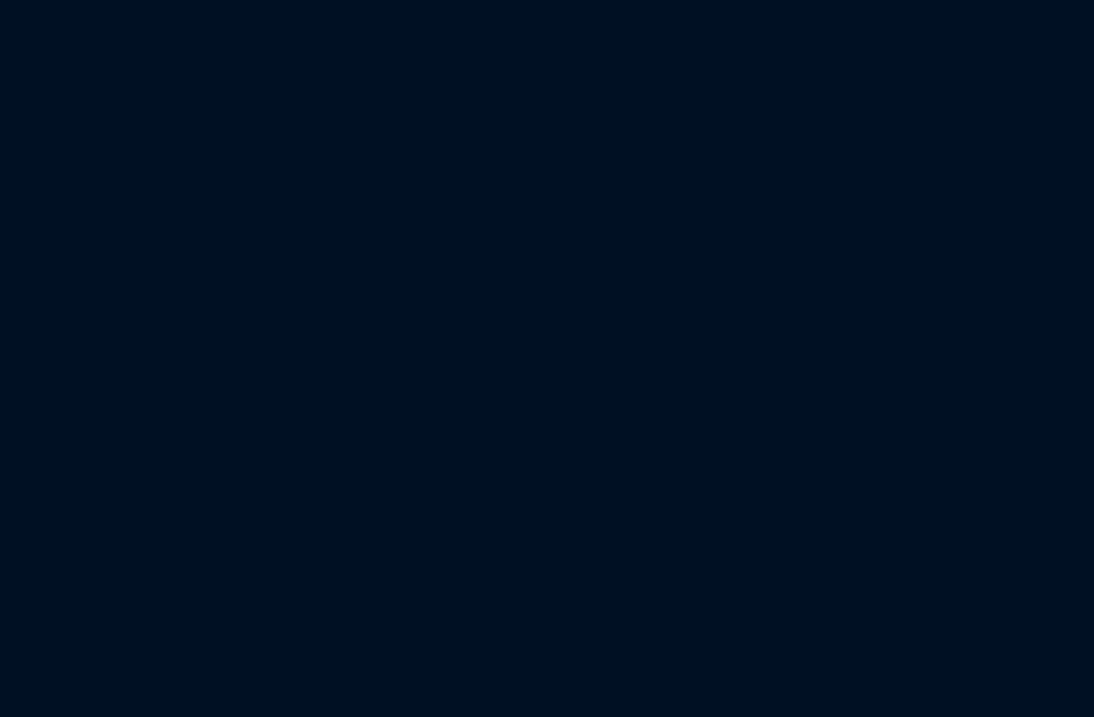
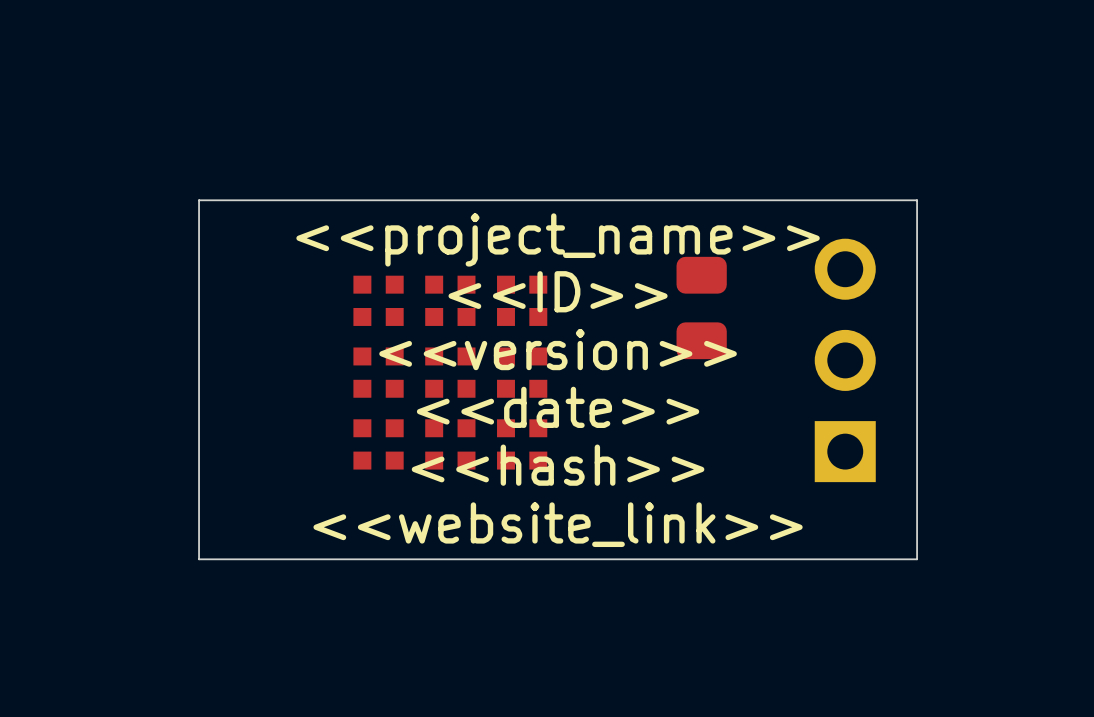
board edge: none -> (917, 200) (199, 200) (199, 559) (917, 559) (917, 200)
text: none -> <<project_name>> (558, 239)
text: none -> <<ID>> (558, 291)
part: none -> (378, 300)
part: none -> (450, 300)
part: none -> (522, 300)
part: none -> (701, 308)
text: none -> <<version>> (558, 349)
part: none -> (845, 360)
part: none -> (378, 372)
part: none -> (450, 372)
part: none -> (522, 372)
text: none -> <<date>> (558, 407)
part: none -> (378, 444)
part: none -> (450, 444)
part: none -> (522, 444)
text: none -> <<hash>> (558, 465)
text: none -> <<website_link>> (558, 524)

